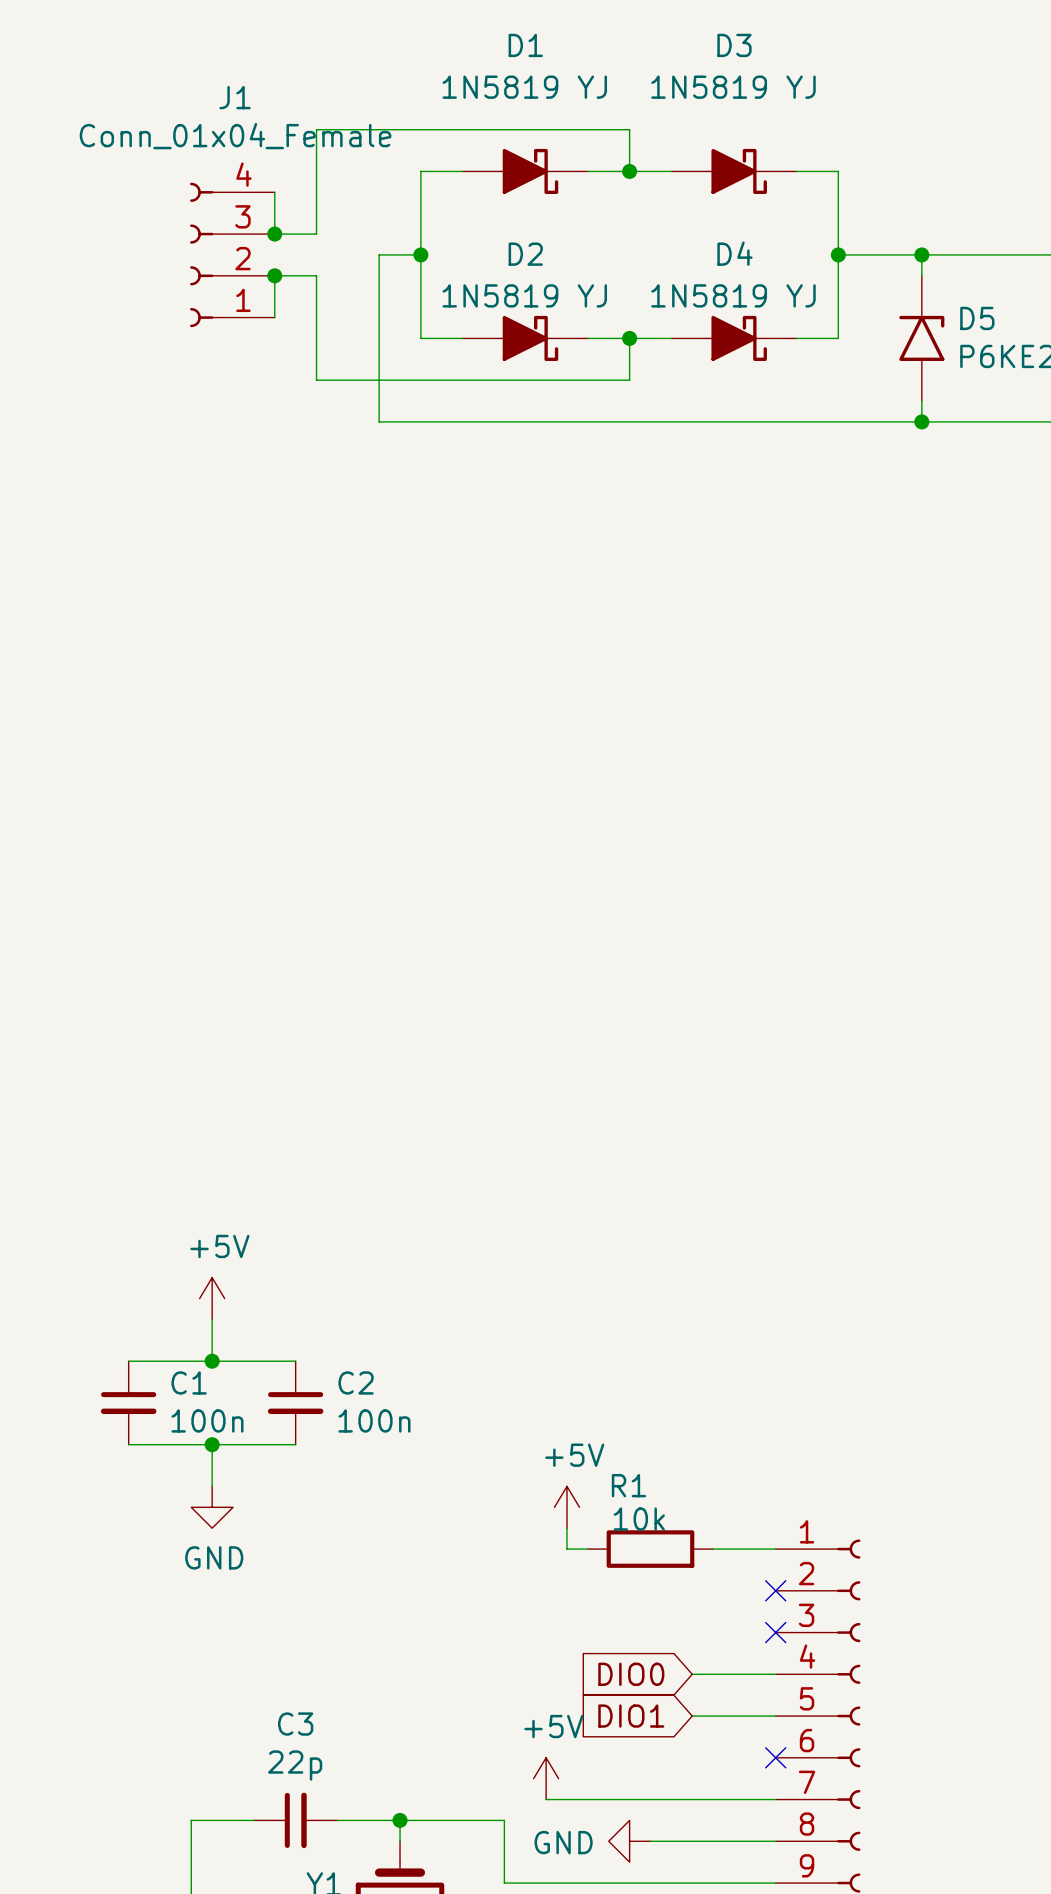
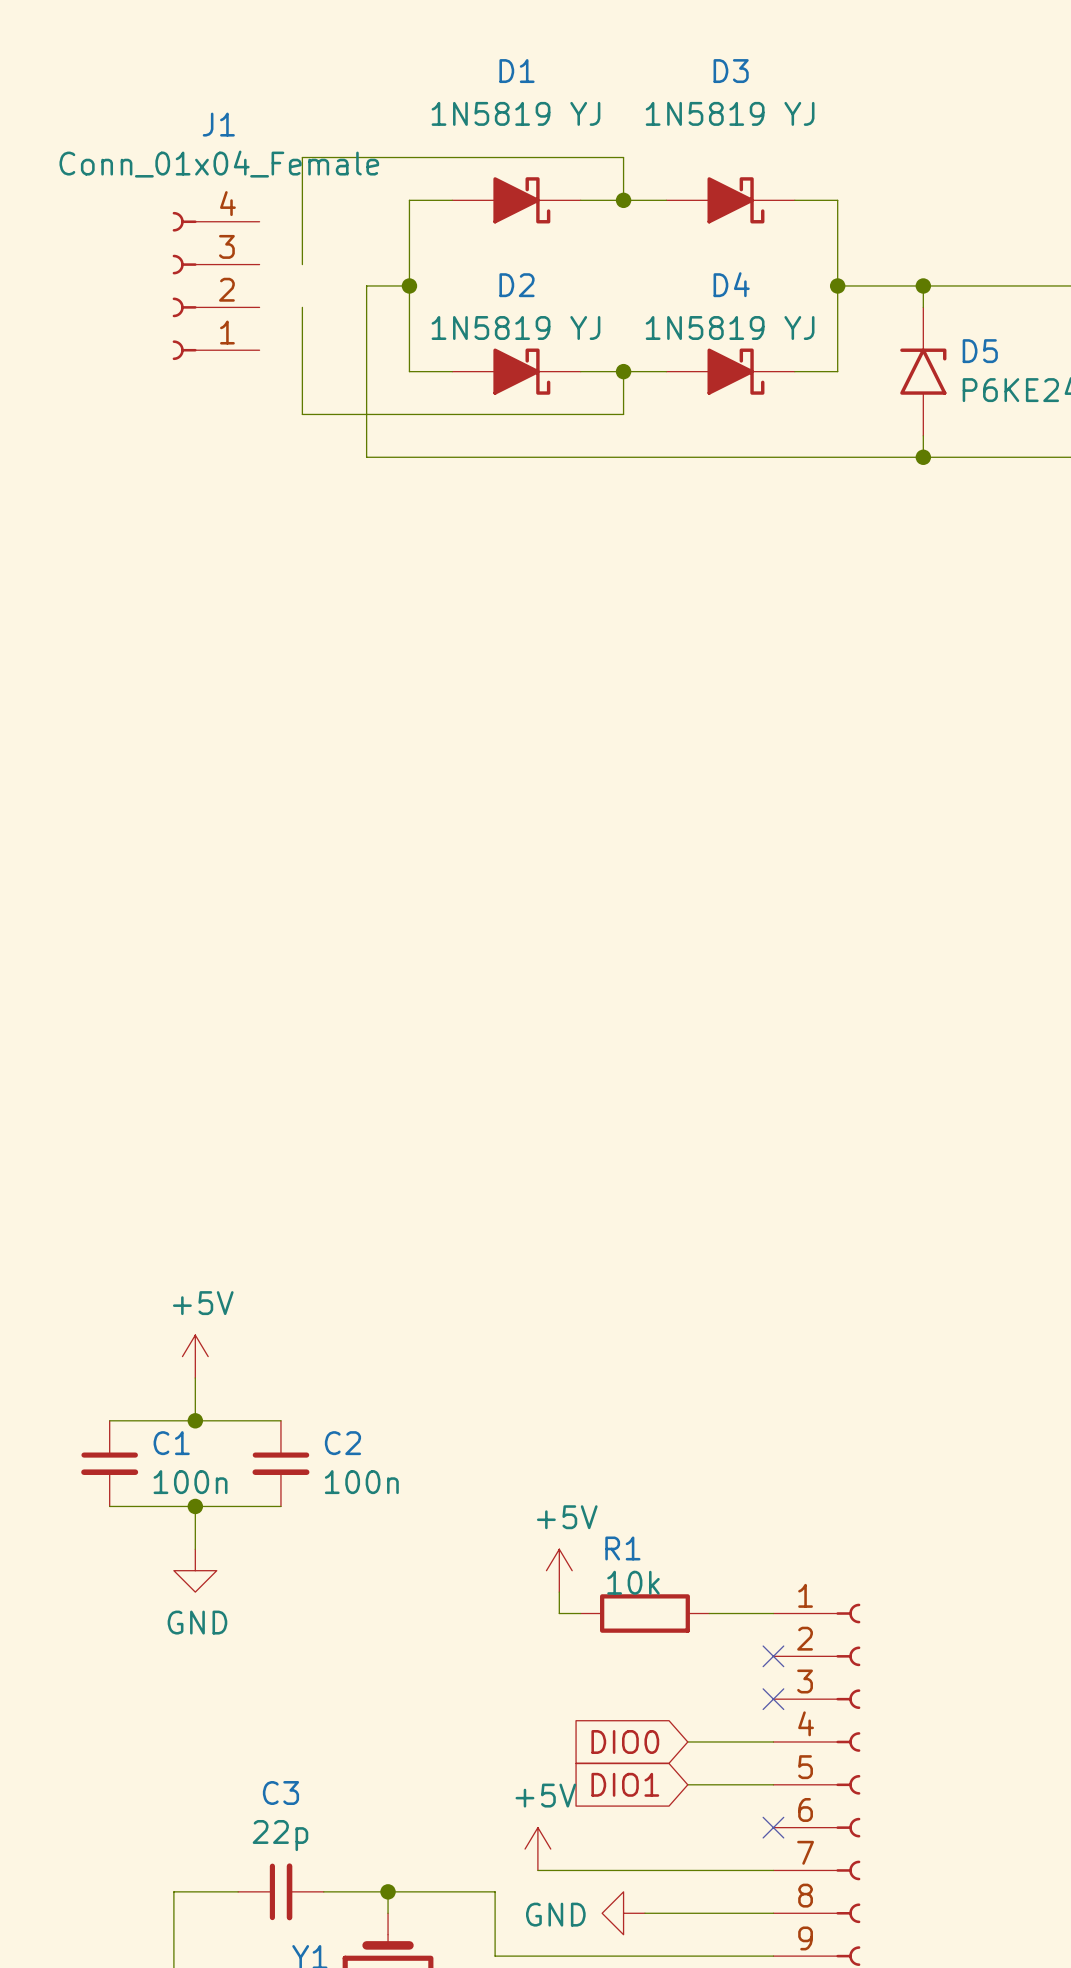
wire: (274, 192) (274, 234) (316, 234) -> none
junction: (274, 234) -> none
junction: (274, 275) -> none
wire: (316, 275) (274, 275) (274, 317) -> none

